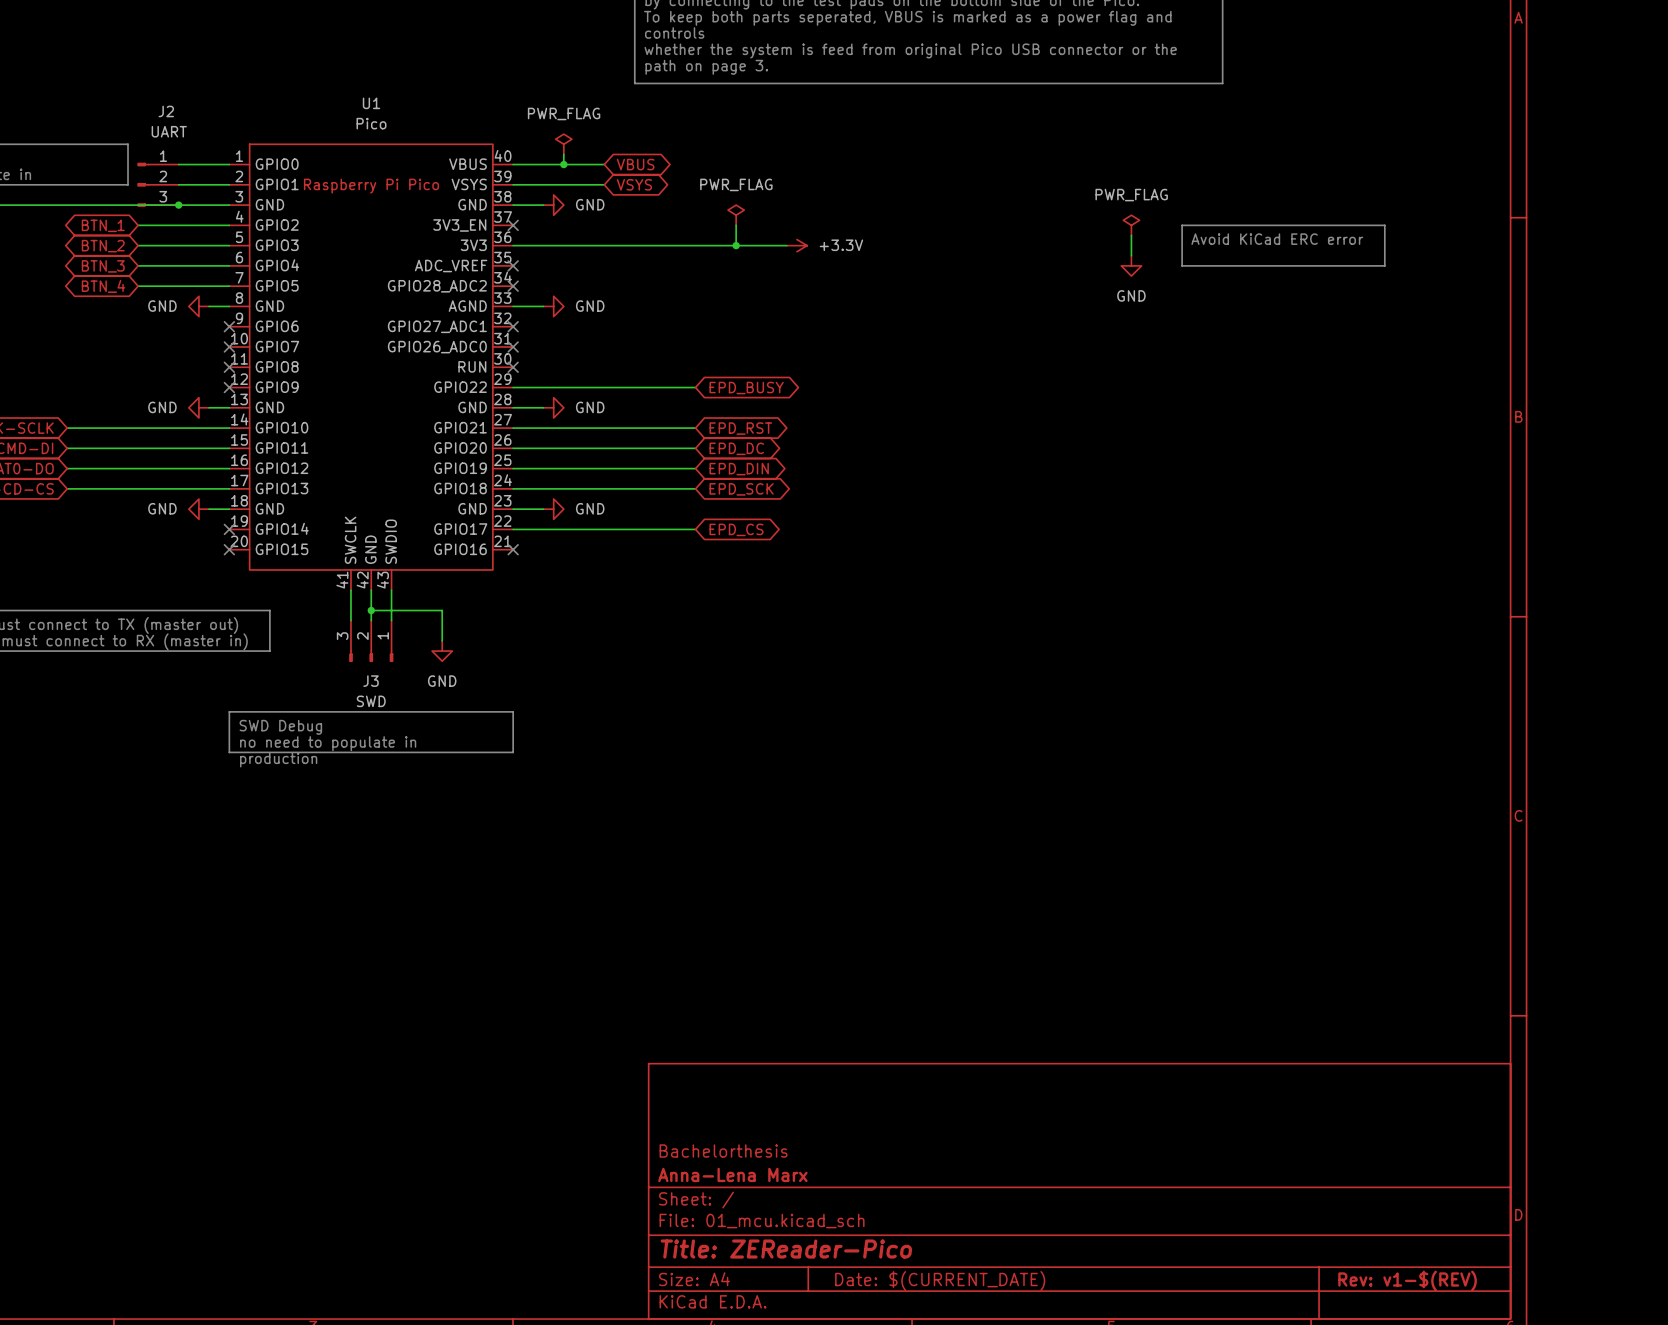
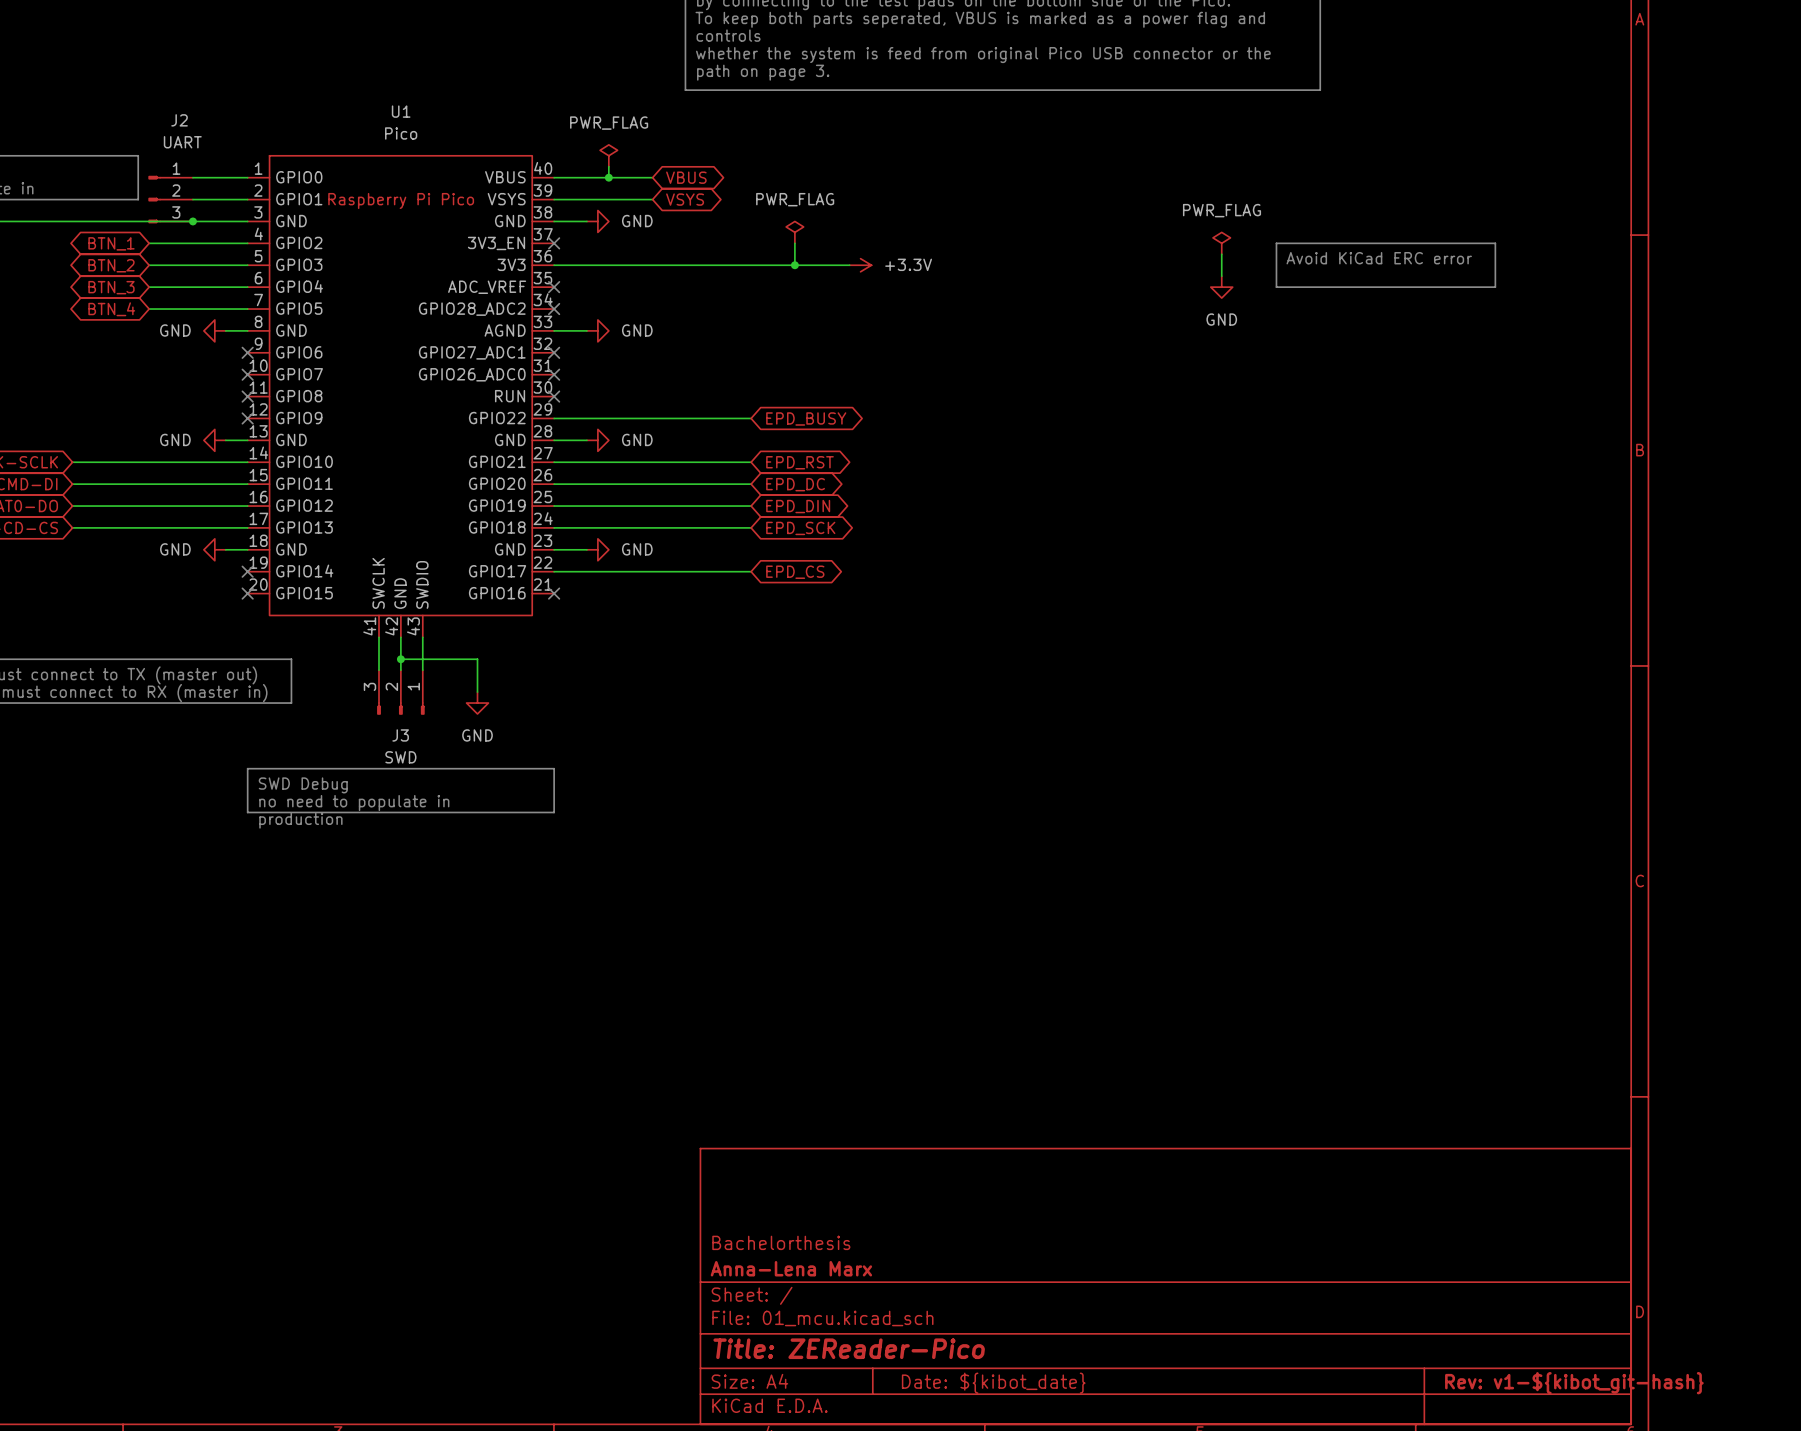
title block: Date: $(CURRENT_DATE) (940, 1280) -> Date: ${kibot_date} (993, 1383)
title block: Rev: v1-$(REV) (1407, 1280) -> Rev: v1-${kibot_git-hash} (1574, 1383)

